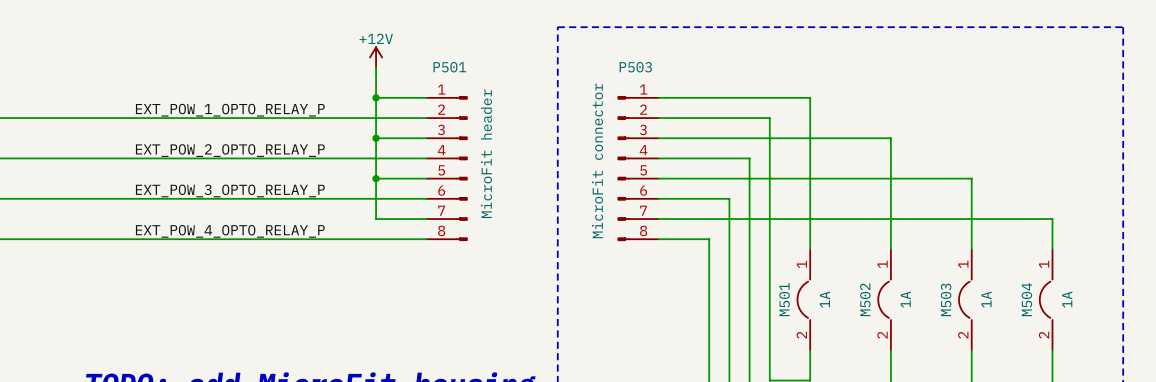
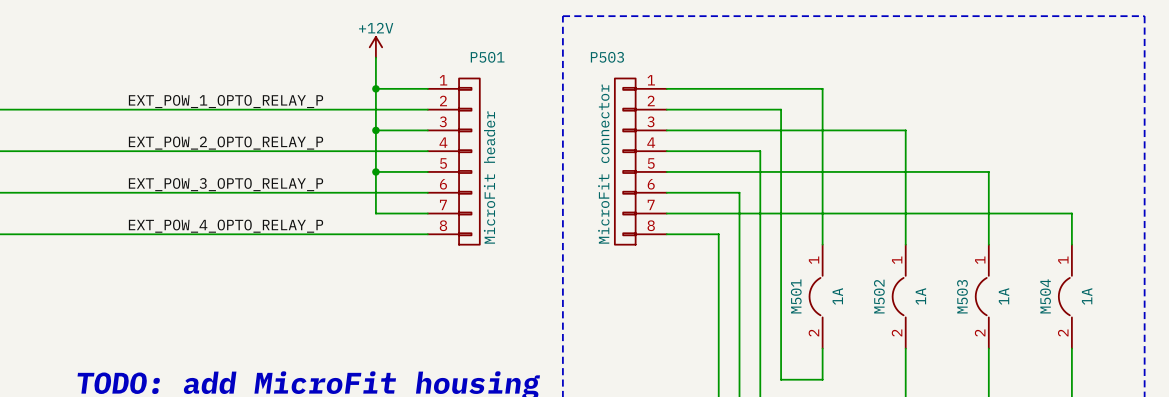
P501 name position: P501 (449, 67) -> P501 (487, 57)
P503 name position: P503 (635, 67) -> P503 (607, 57)
P501 symbol: [426, 96, 468, 241] -> [427, 78, 480, 245]
P503 symbol: [617, 96, 659, 241] -> [614, 78, 667, 245]
P501 value position: MicroFit header (486, 153) -> MicroFit header (489, 177)

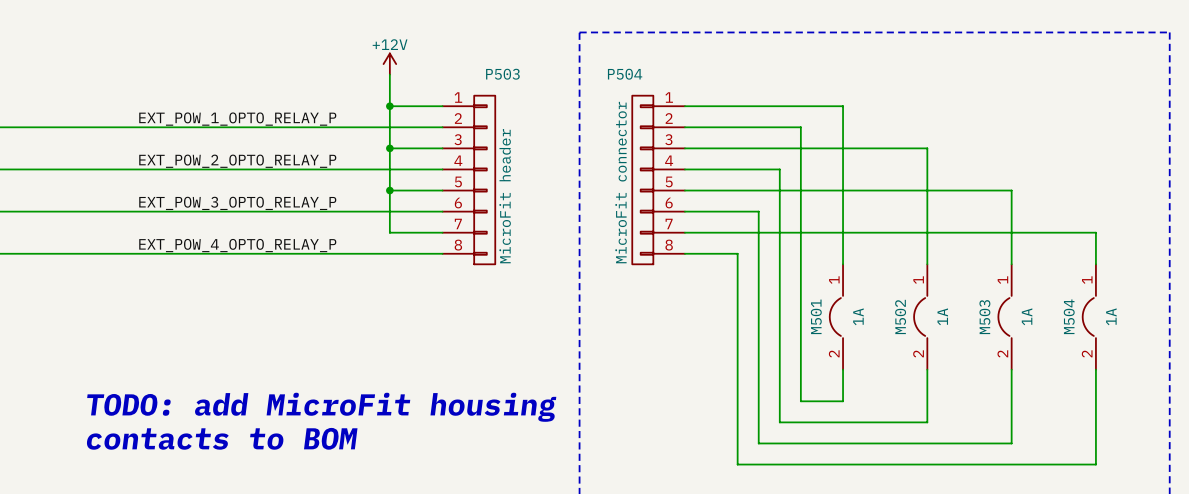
P501 name: P501 (487, 57) -> P503 (502, 74)
P503 name: P503 (607, 57) -> P504 (625, 74)

